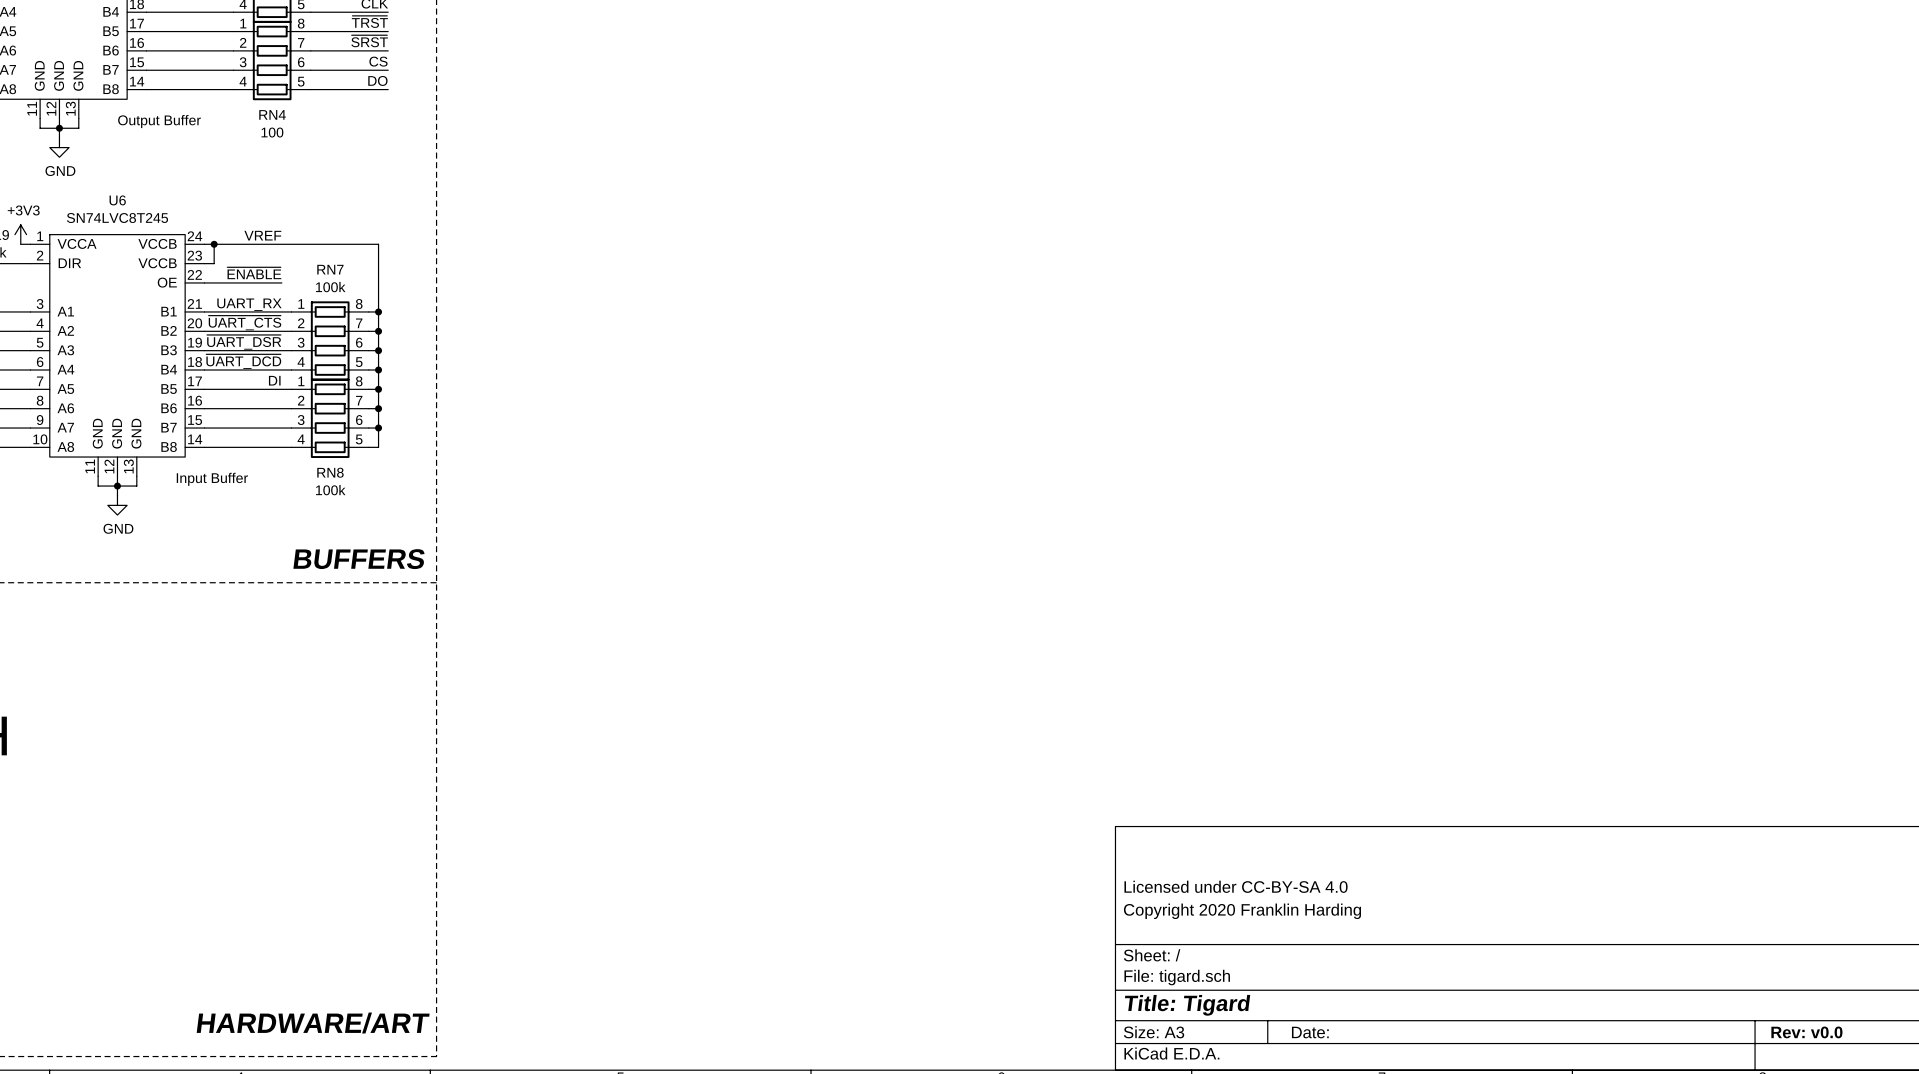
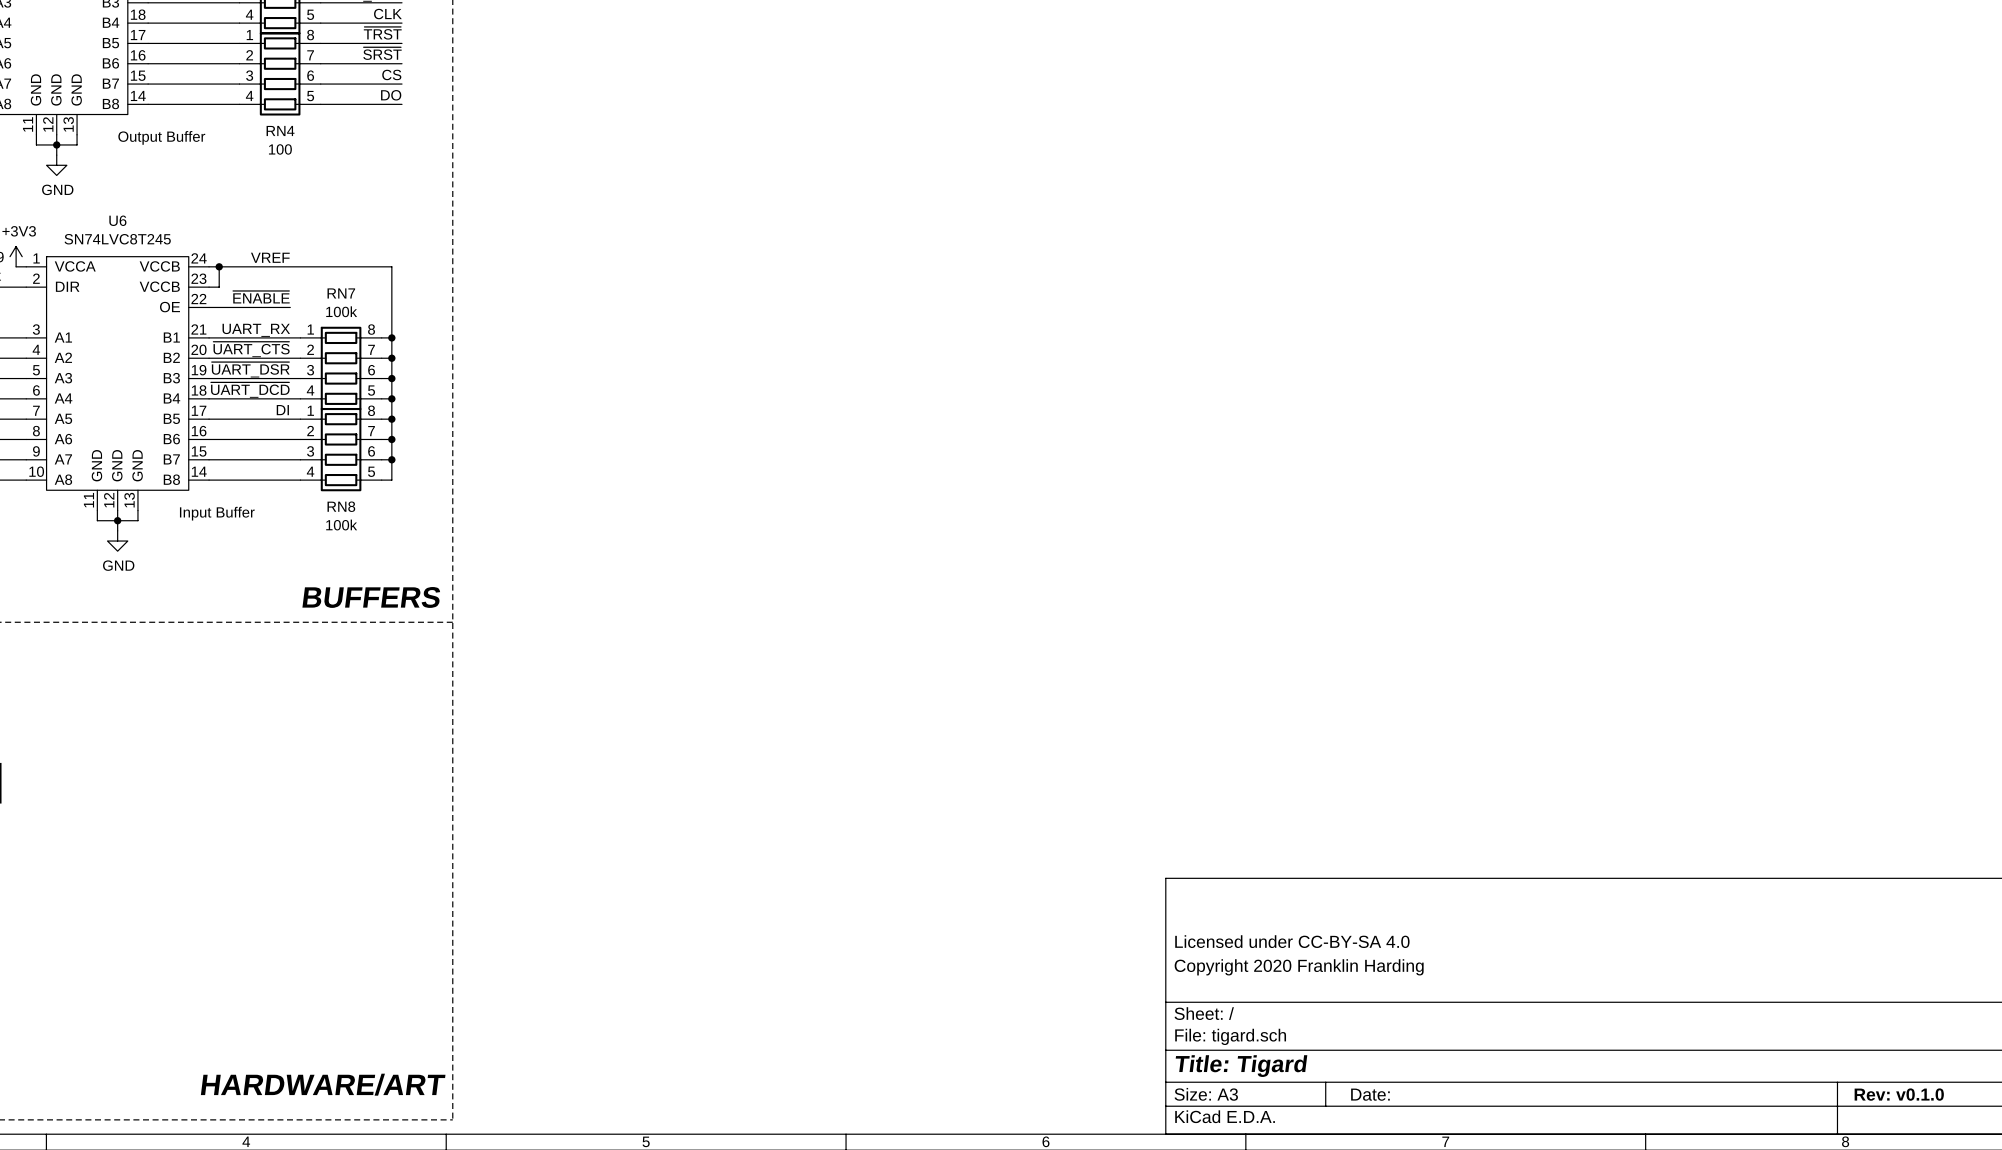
title block: Rev: v0.0 (1806, 1032) -> Rev: v0.1.0 (1899, 1094)

